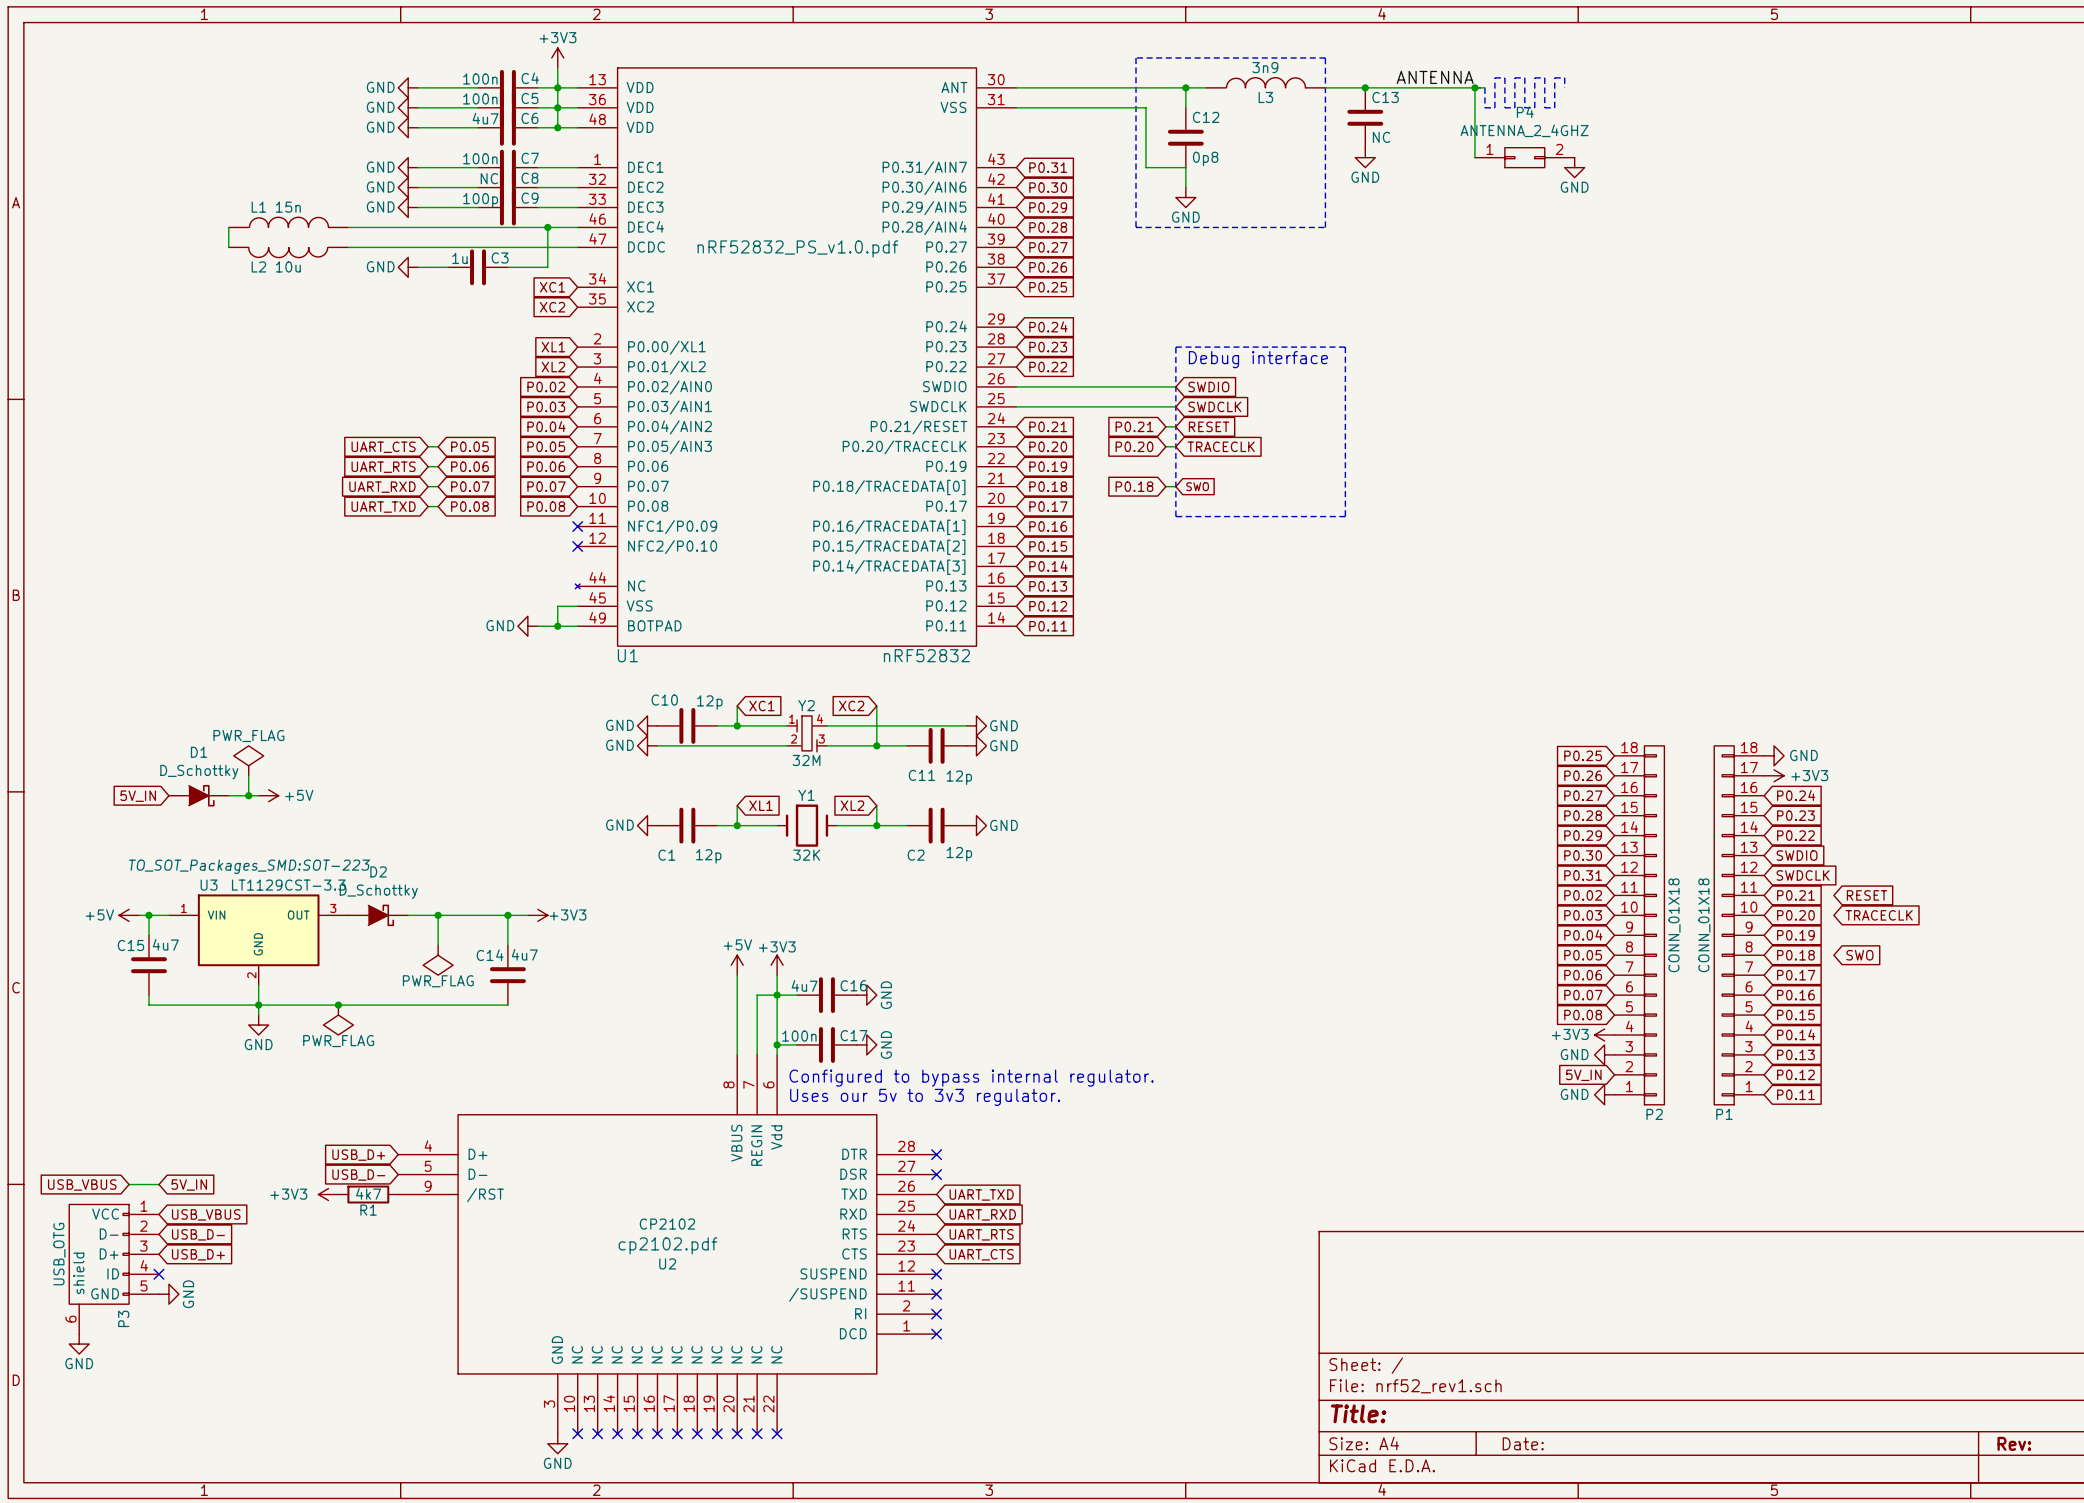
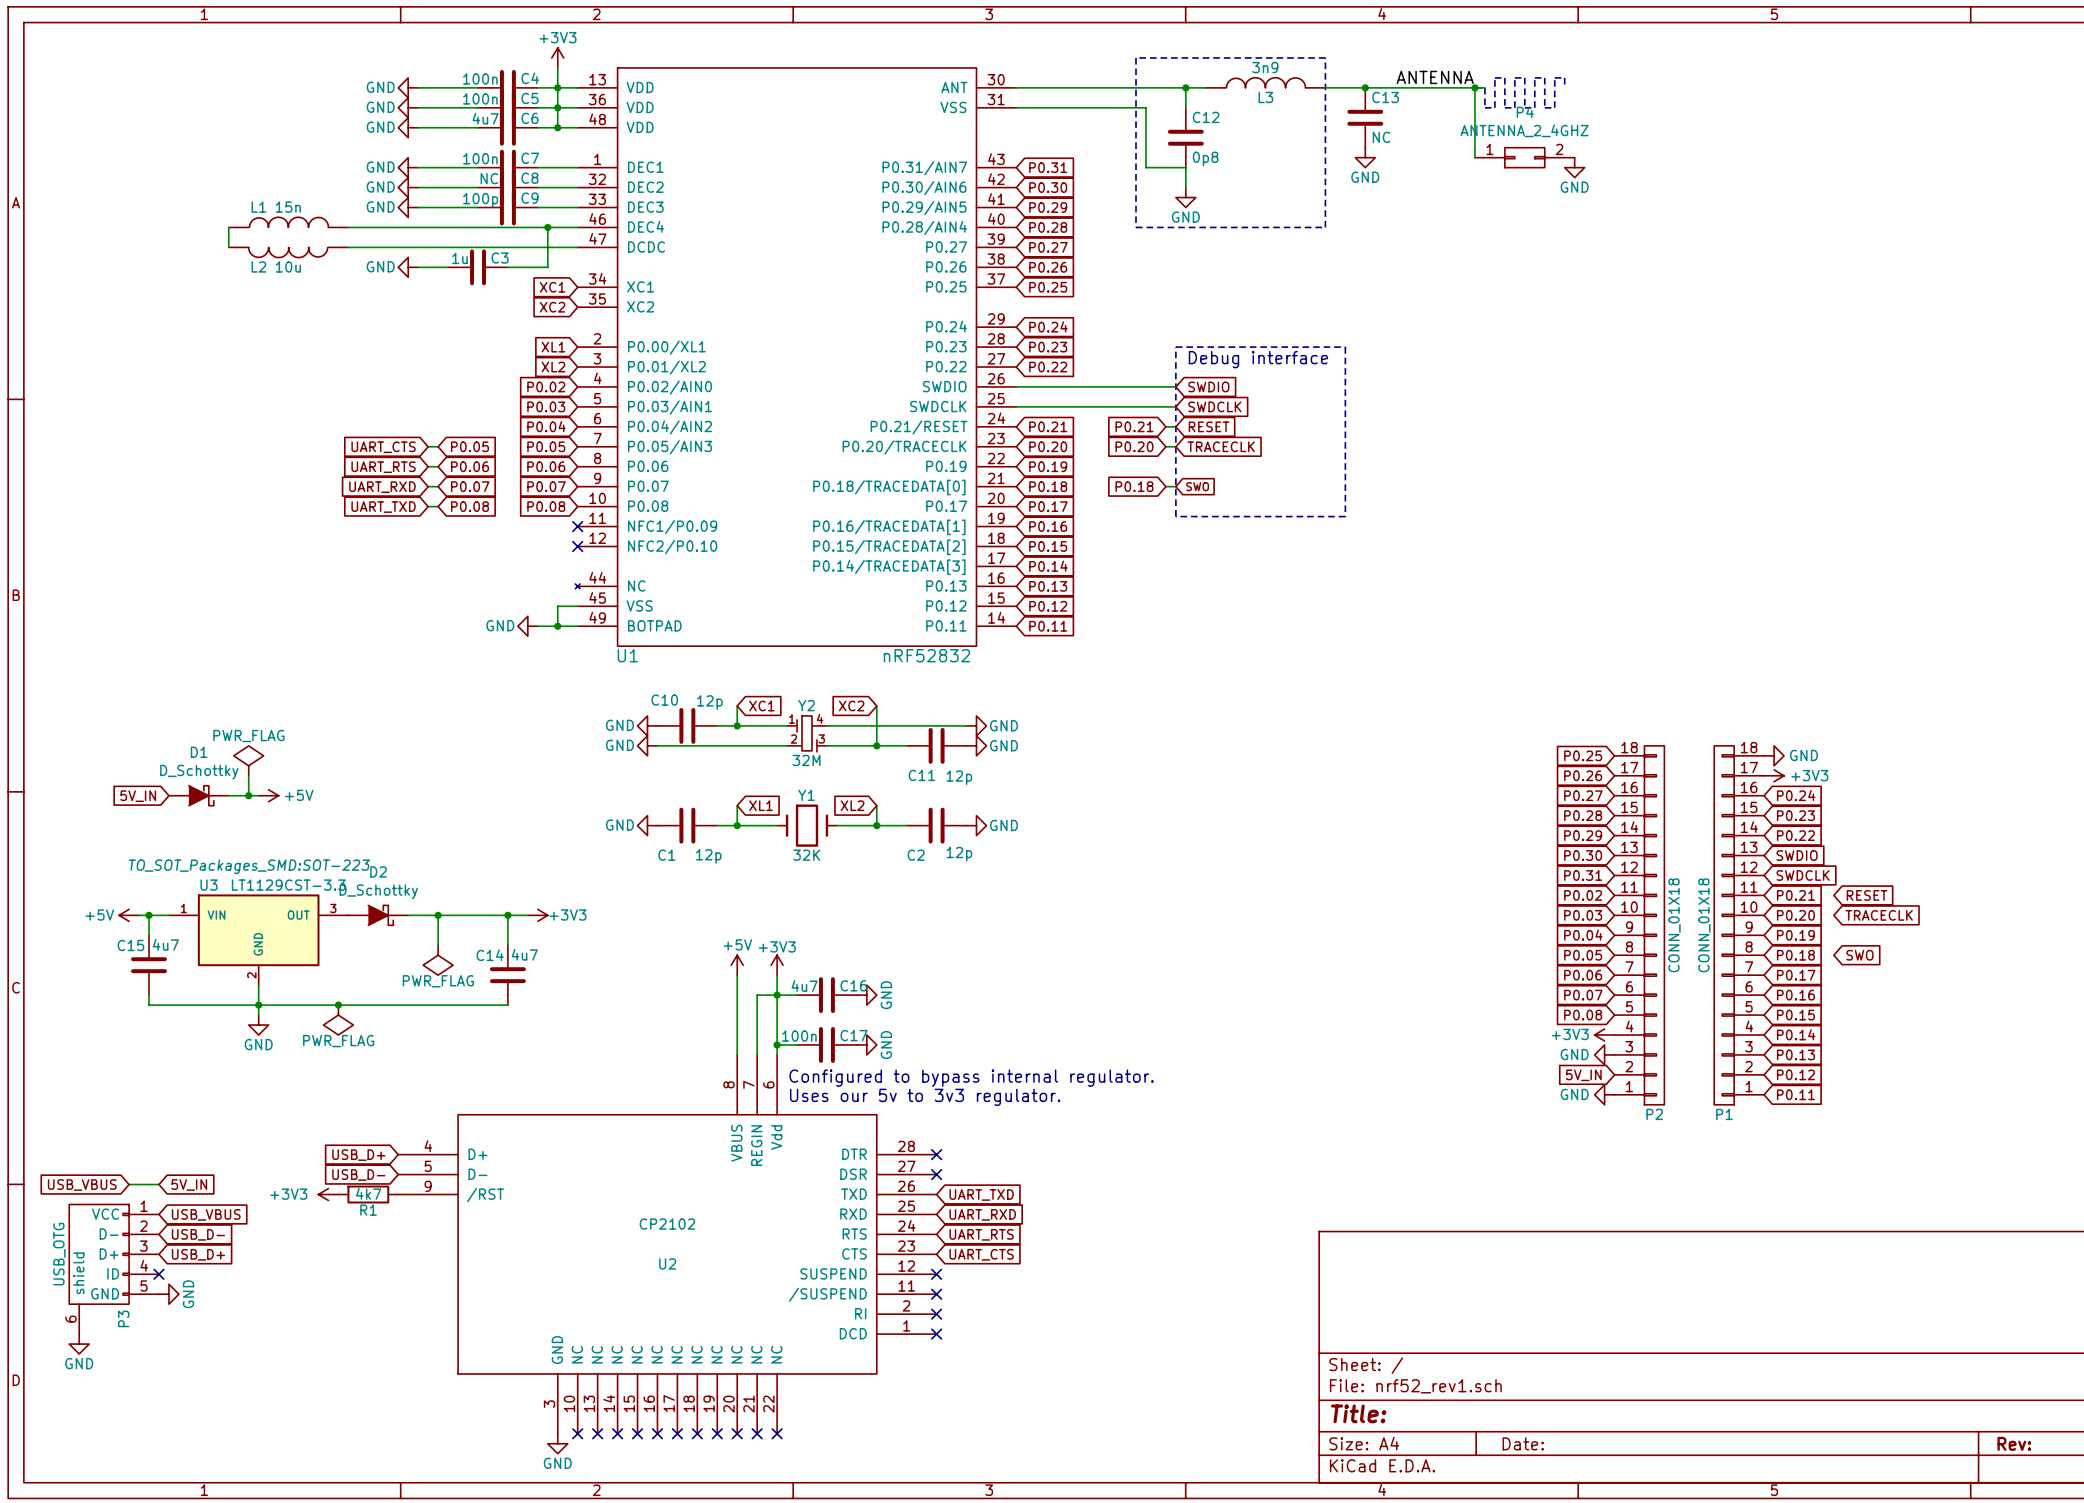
U1 text: nRF52832_PS_v1.0.pdf (797, 248) -> none
U2 text: cp2102.pdf (668, 1245) -> none

